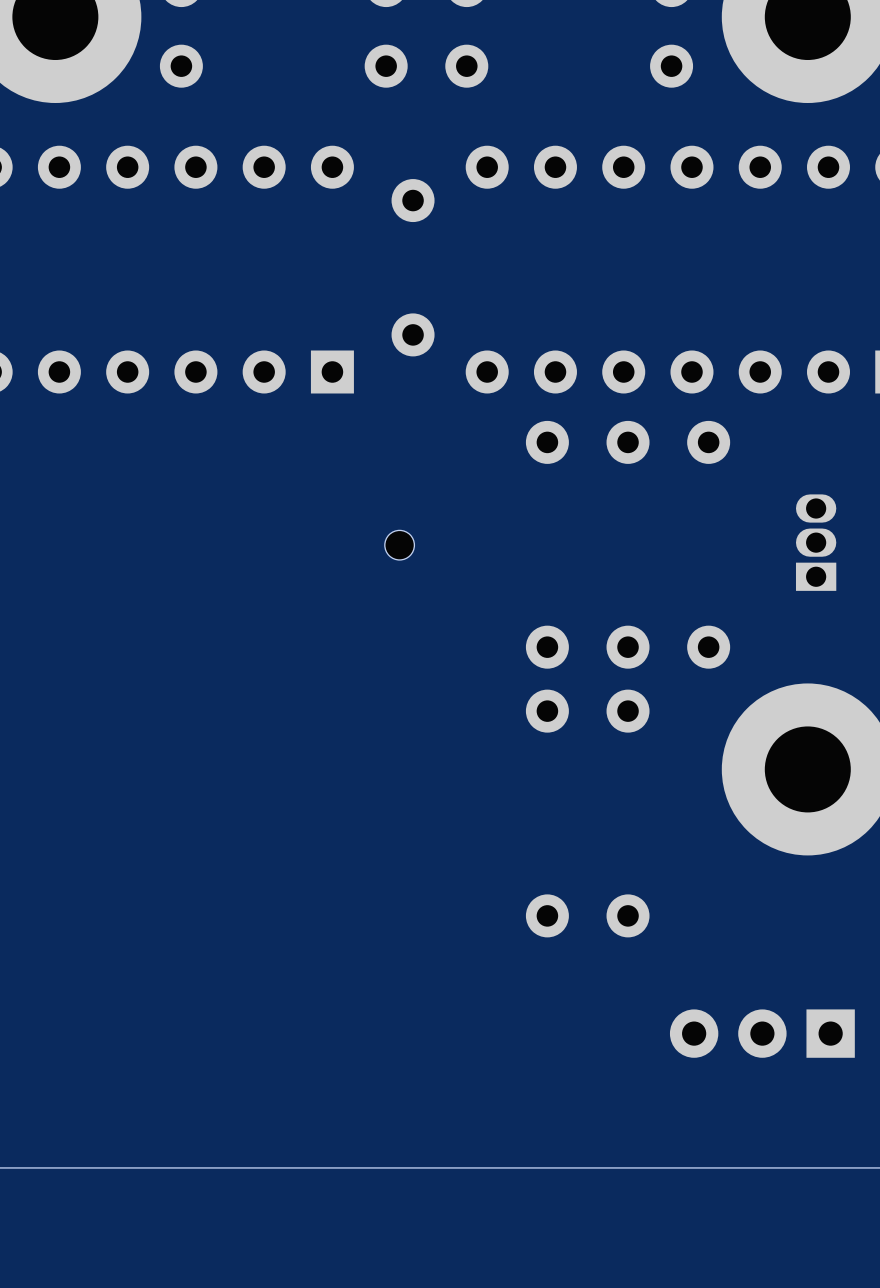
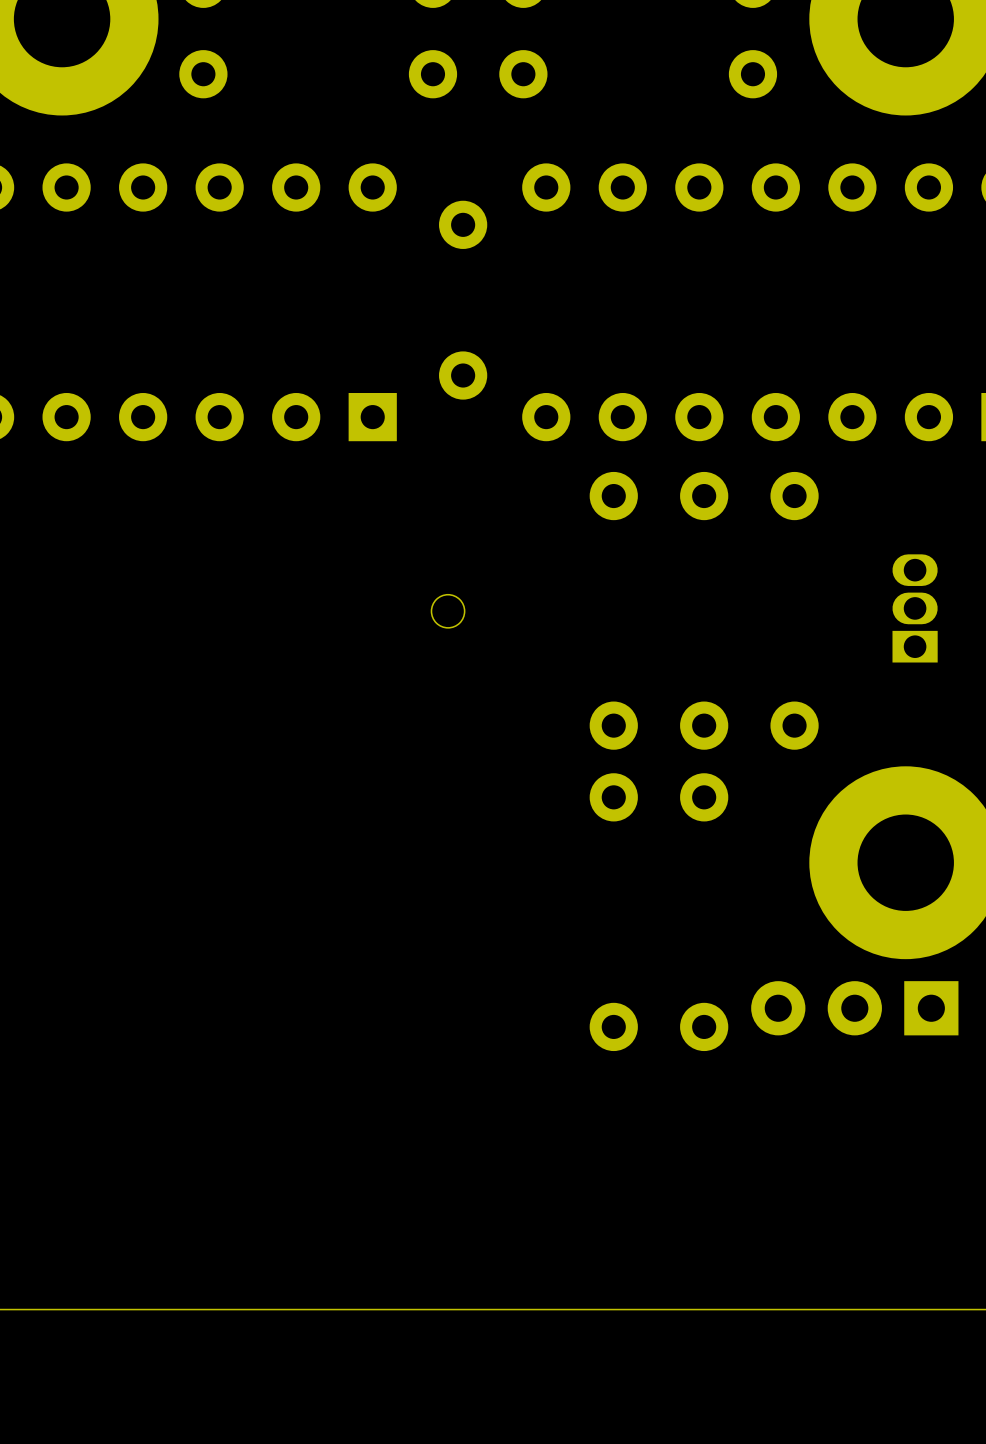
part position: (762, 1033) -> (854, 1008)

